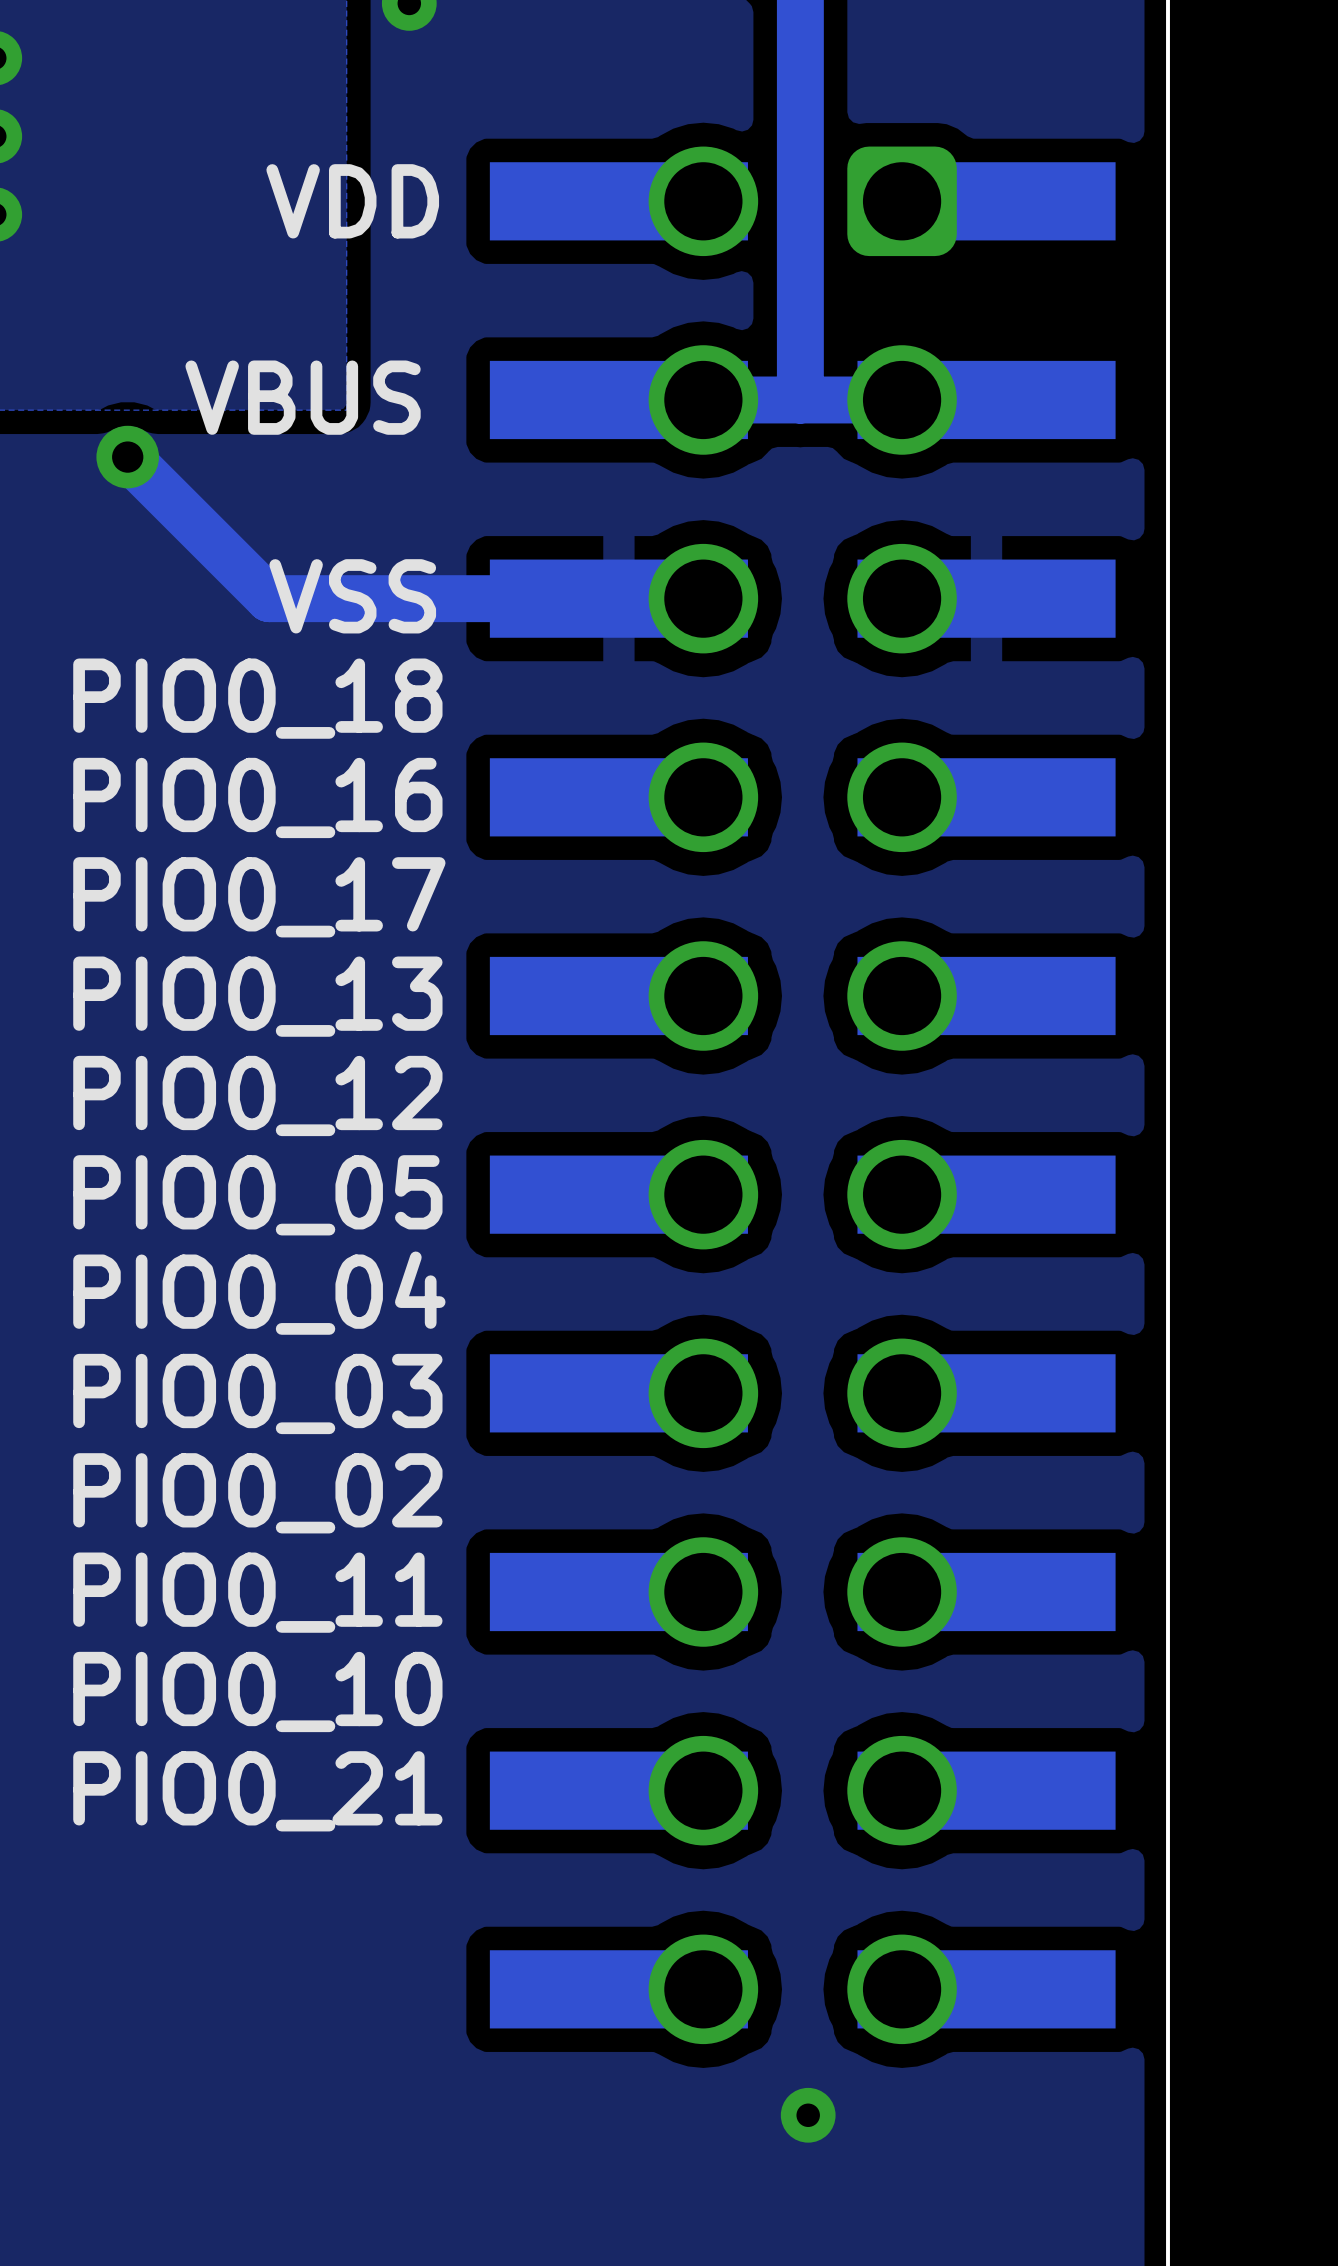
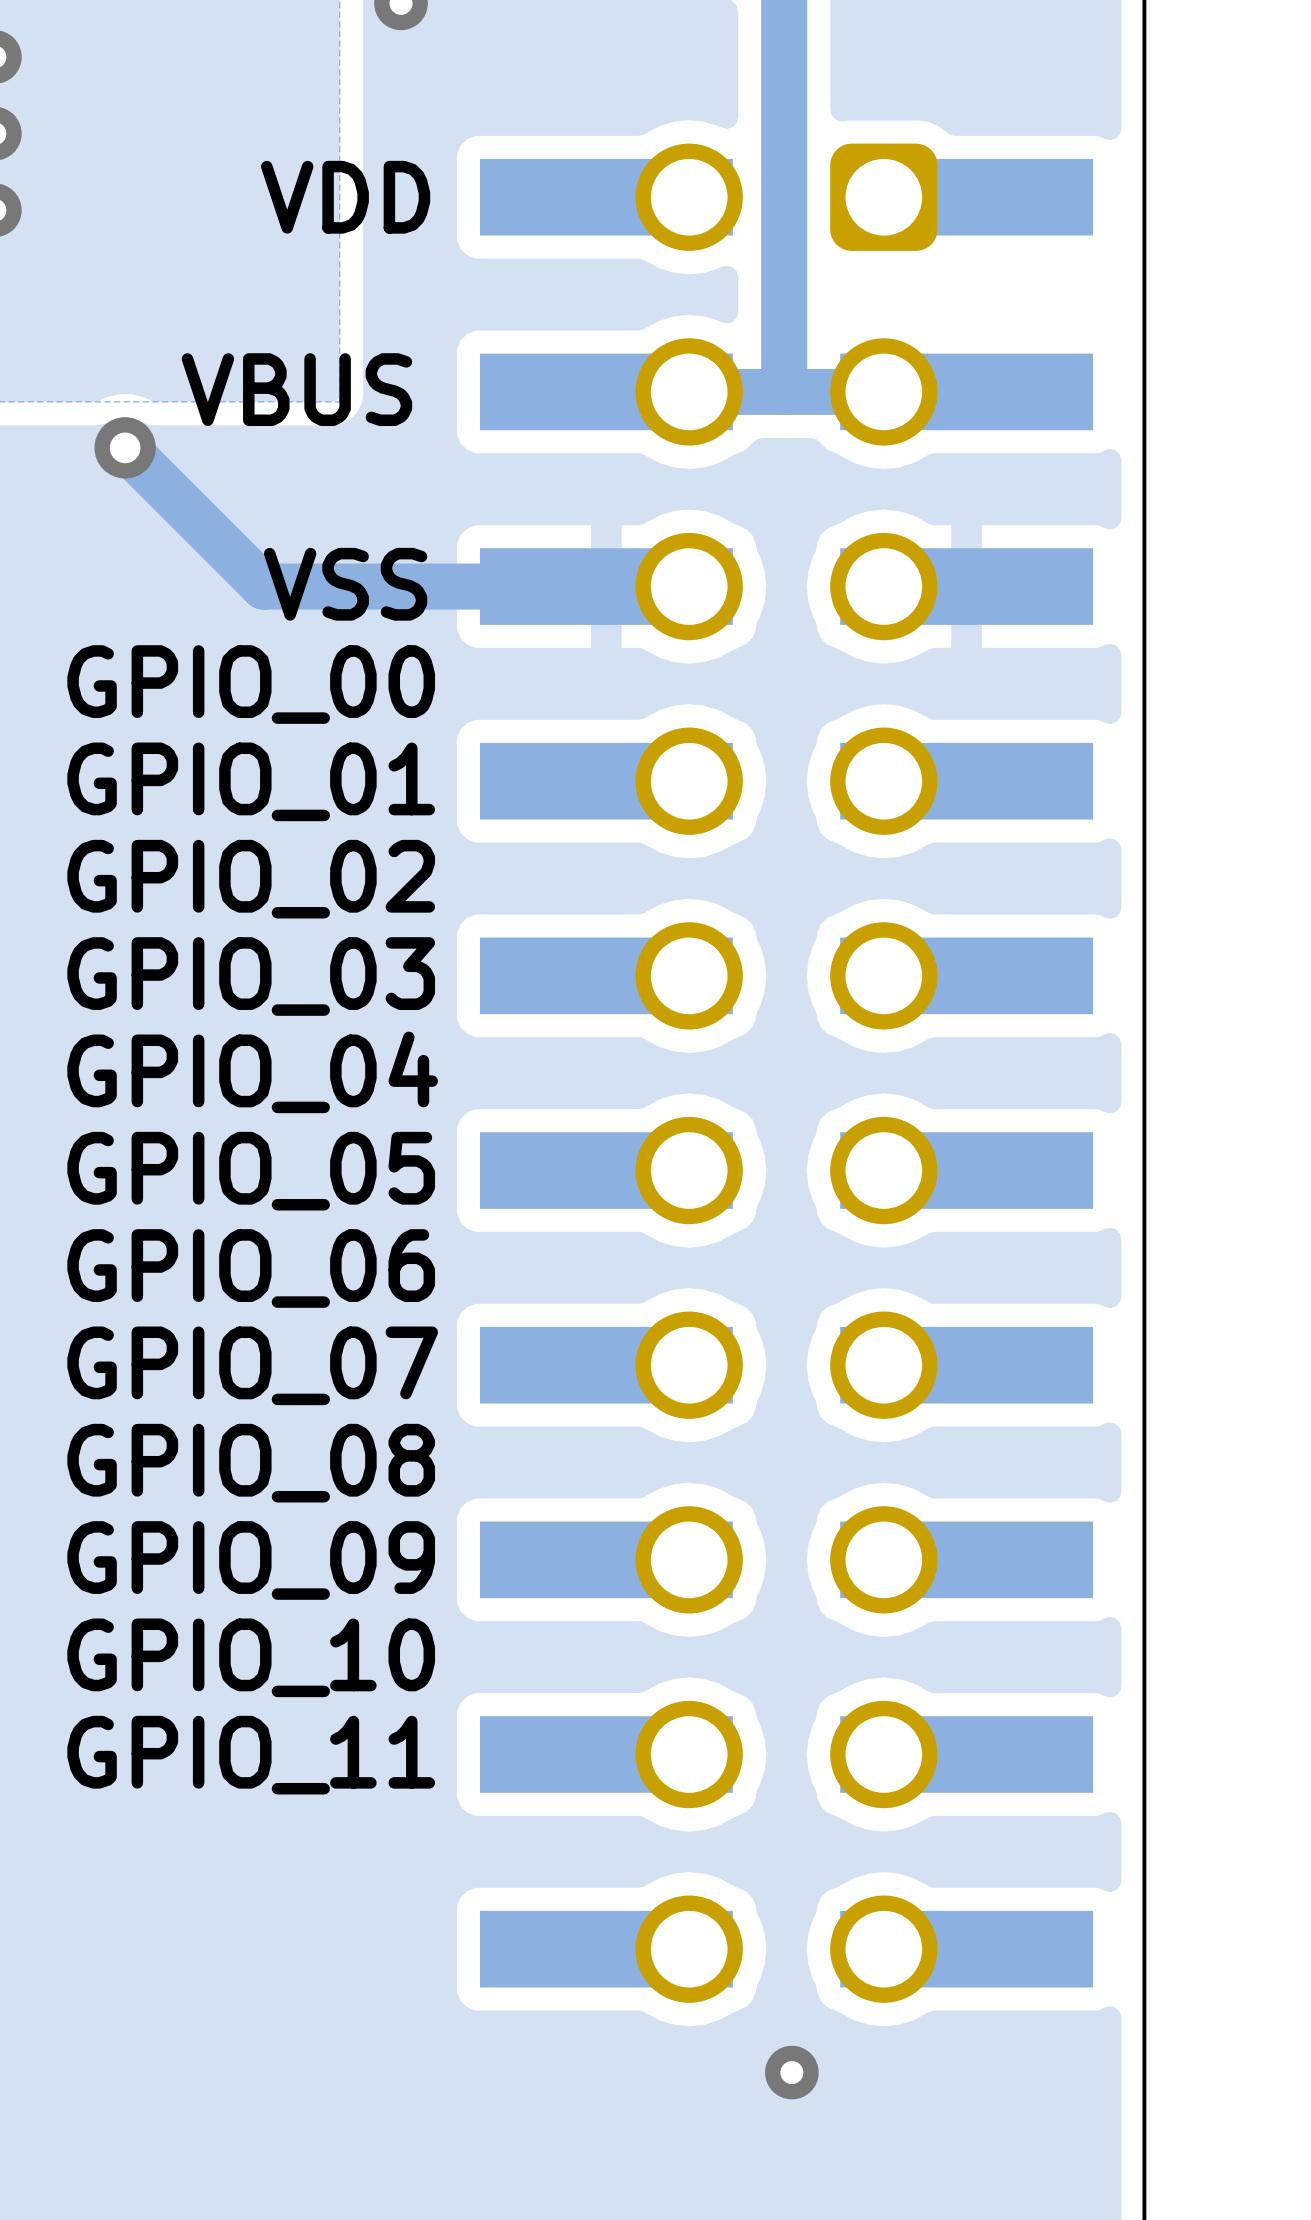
part footprint: [489, 146, 1116, 2045] -> [479, 143, 1094, 2003]

